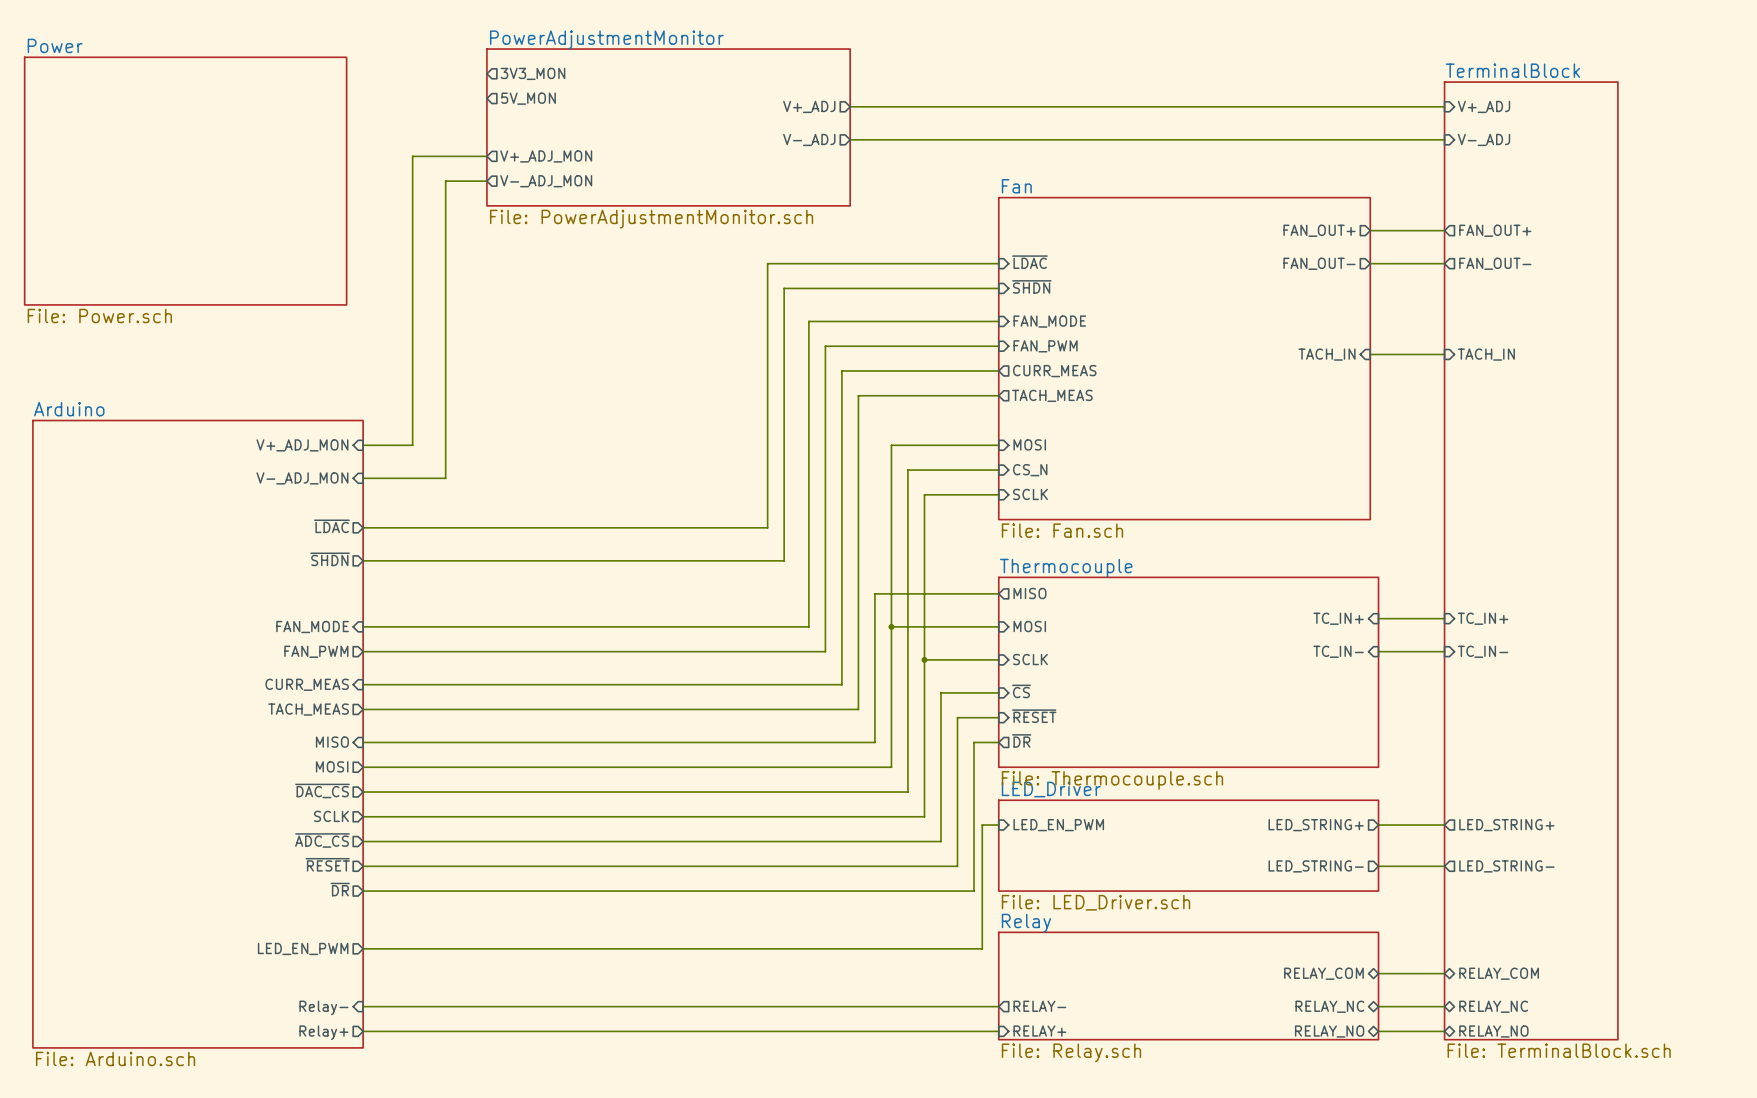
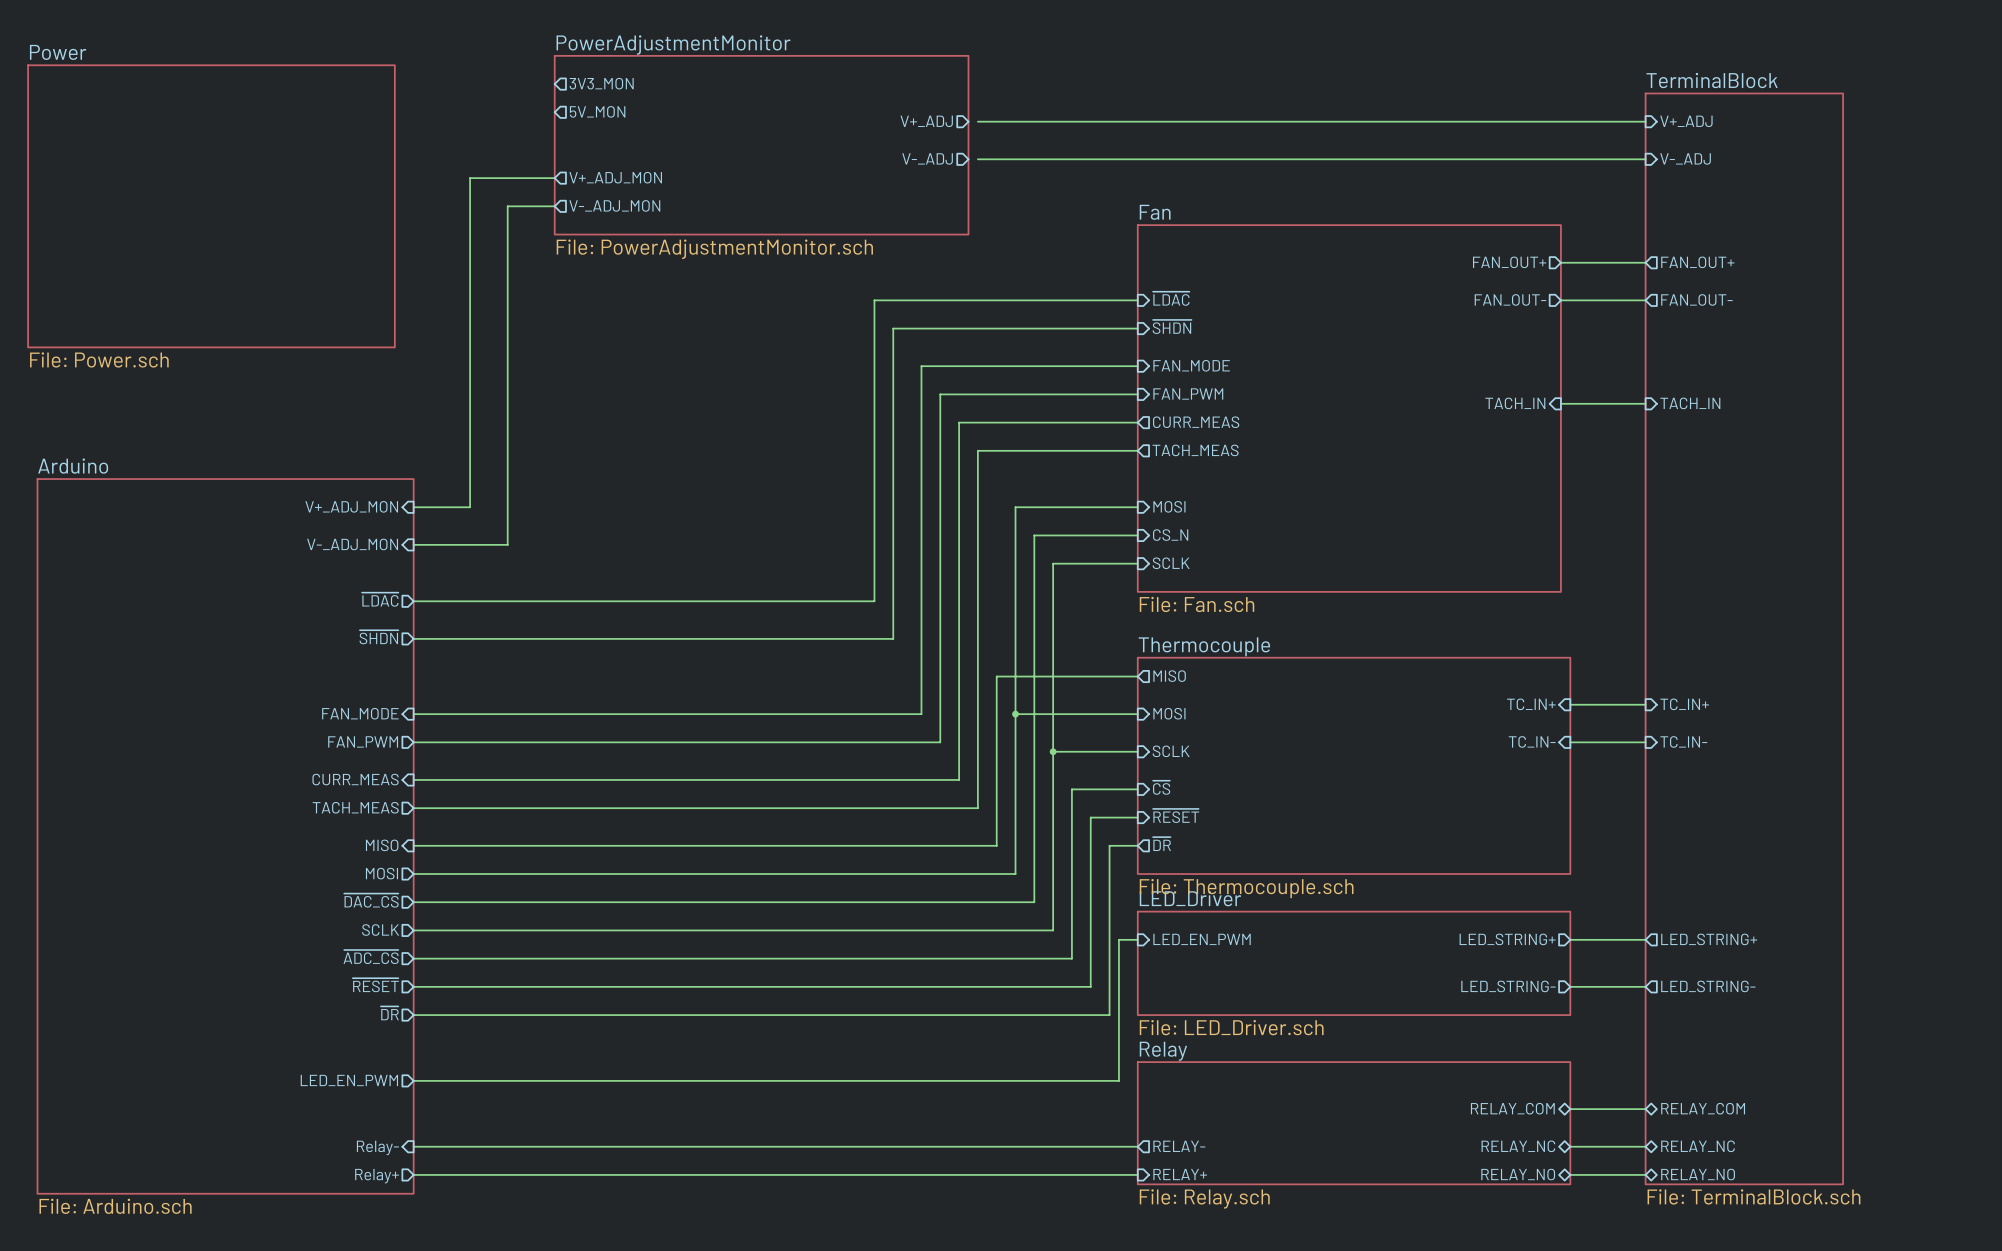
wire: (850, 106) (858, 106) -> none
wire: (850, 139) (858, 139) -> none

